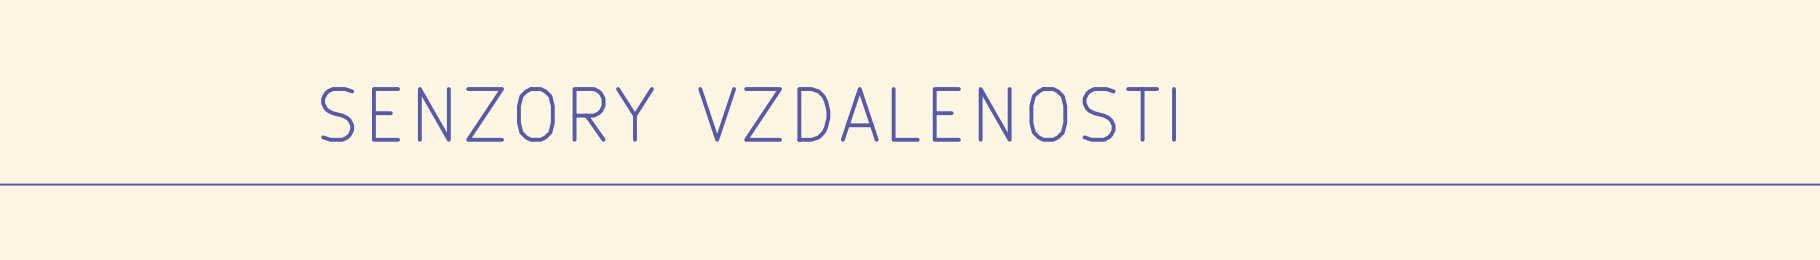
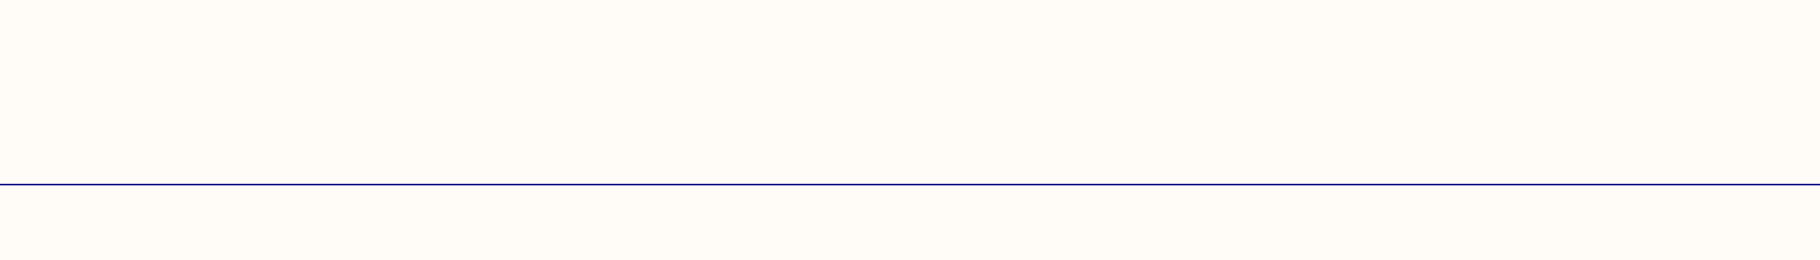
text: SENZORY VZDALENOSTI (748, 114) -> none

